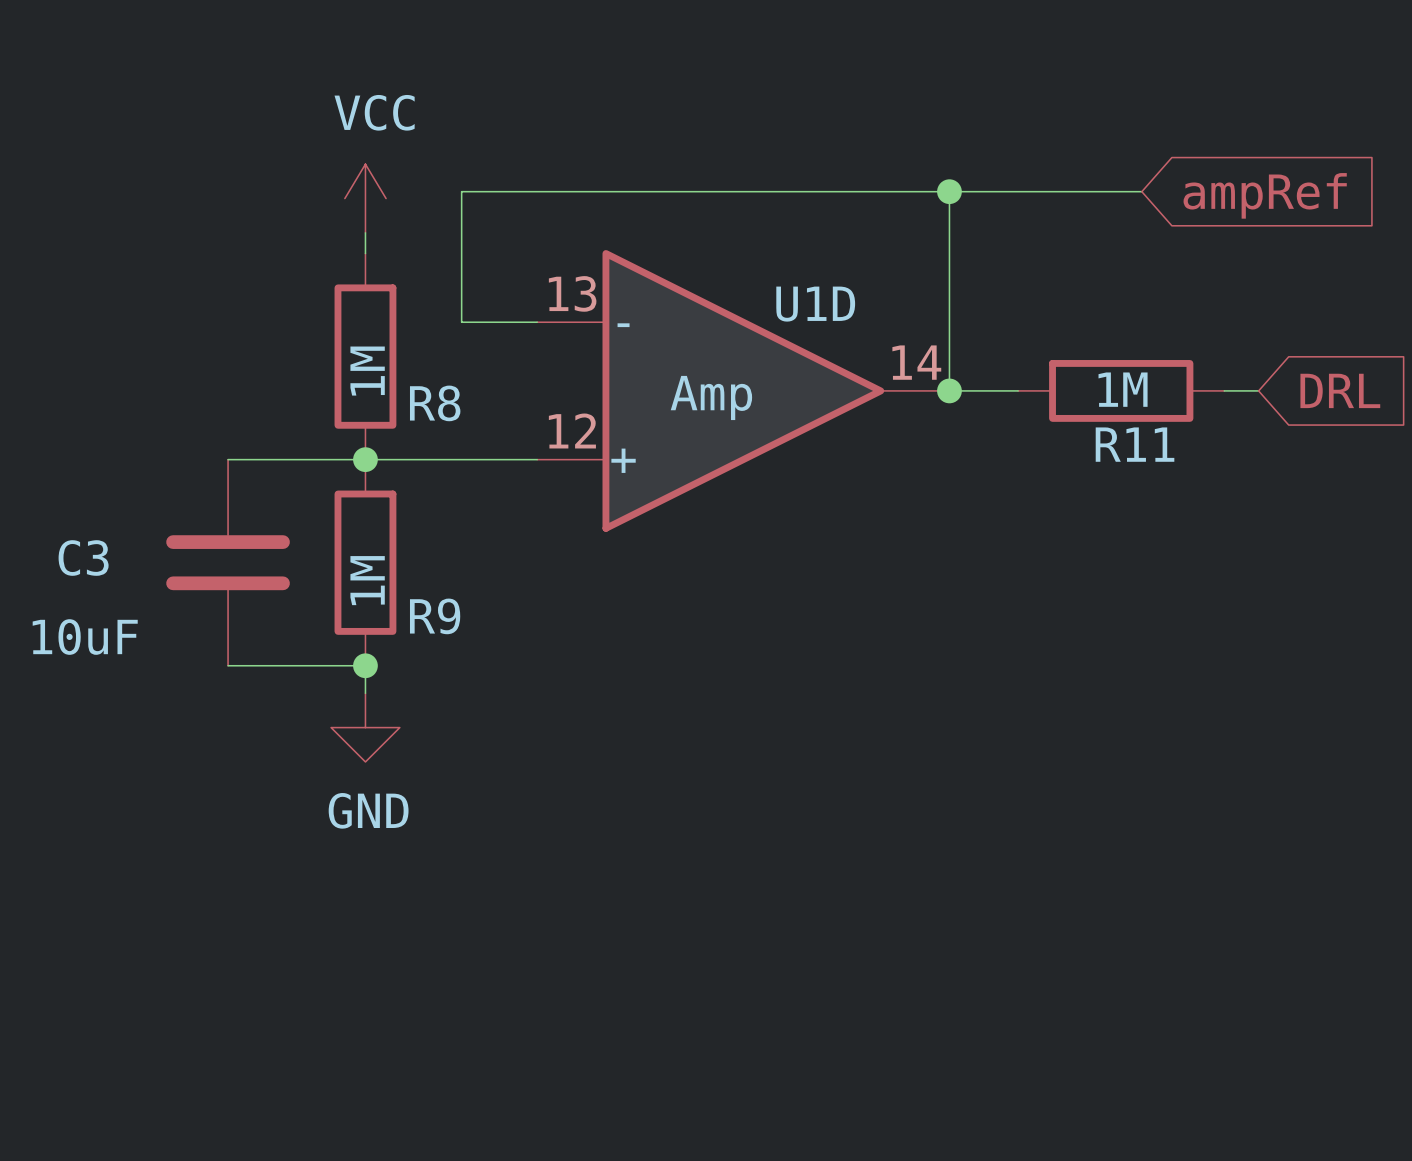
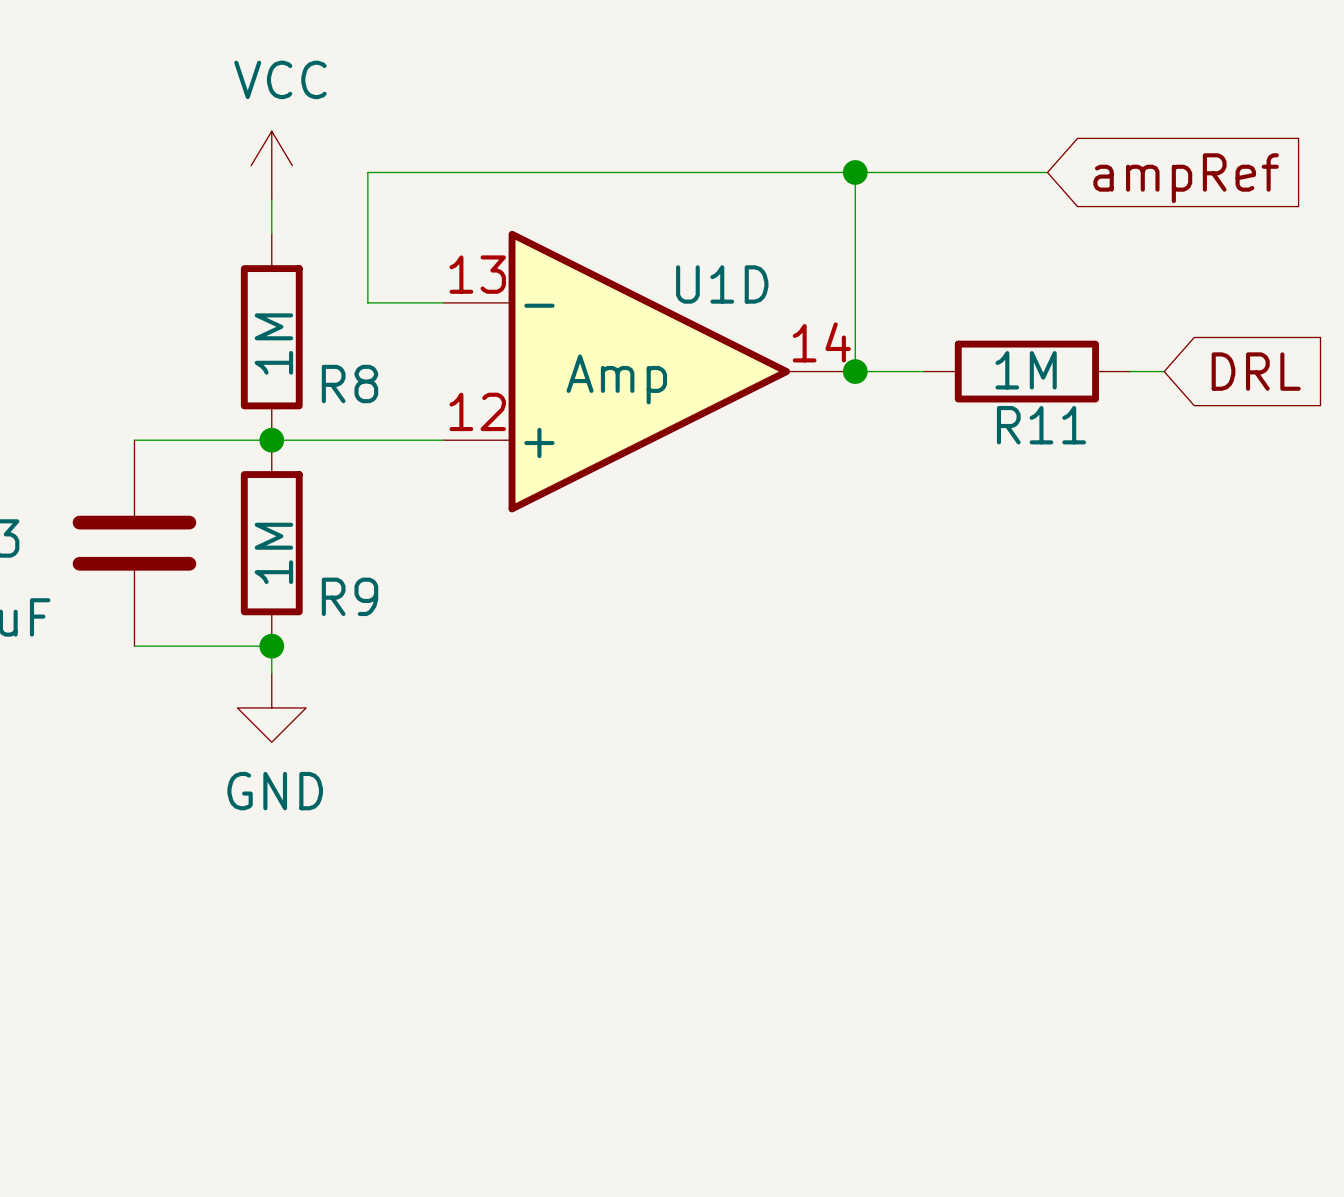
power symbol position: VCC (365, 198) -> VCC (271, 165)

